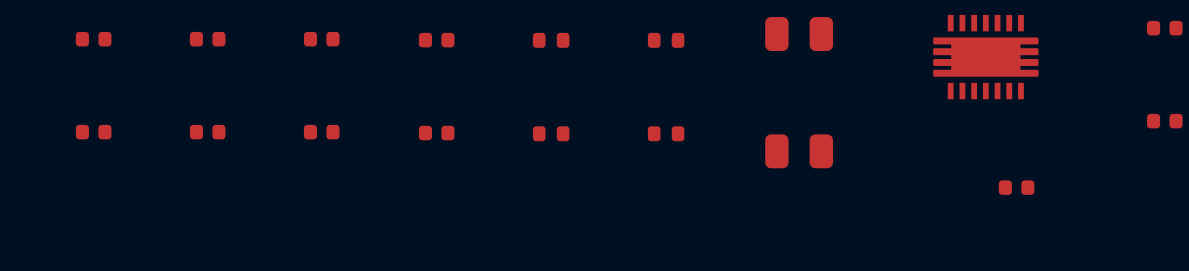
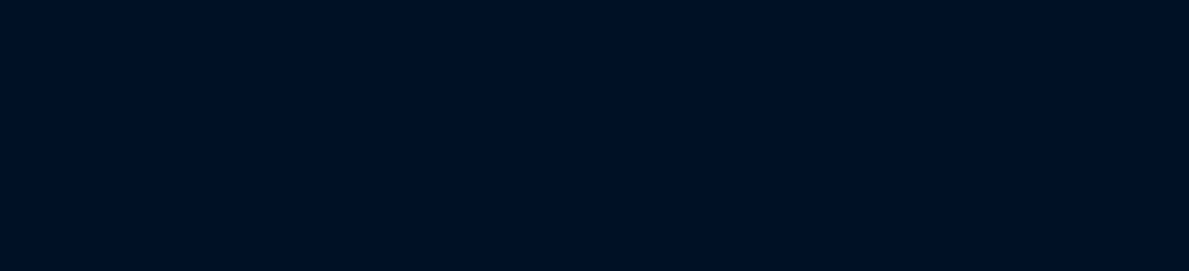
part: (1164, 28) -> none
part: (799, 34) -> none
part: (93, 39) -> none
part: (207, 39) -> none
part: (321, 39) -> none
part: (436, 40) -> none
part: (551, 40) -> none
part: (666, 40) -> none
part: (985, 57) -> none
part: (1164, 121) -> none
part: (93, 132) -> none
part: (207, 132) -> none
part: (321, 132) -> none
part: (436, 133) -> none
part: (551, 133) -> none
part: (666, 133) -> none
part: (799, 151) -> none
part: (1016, 187) -> none

